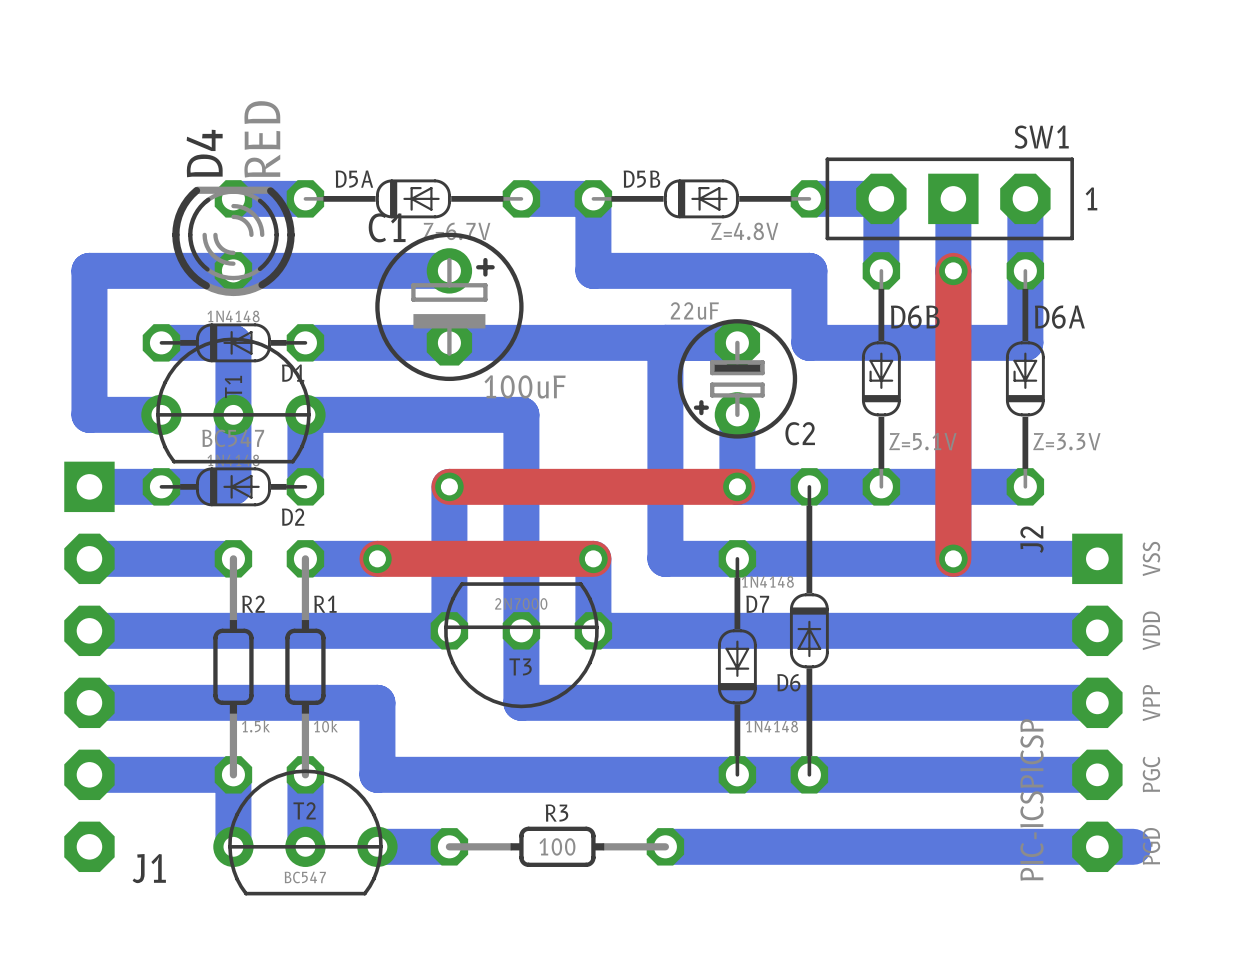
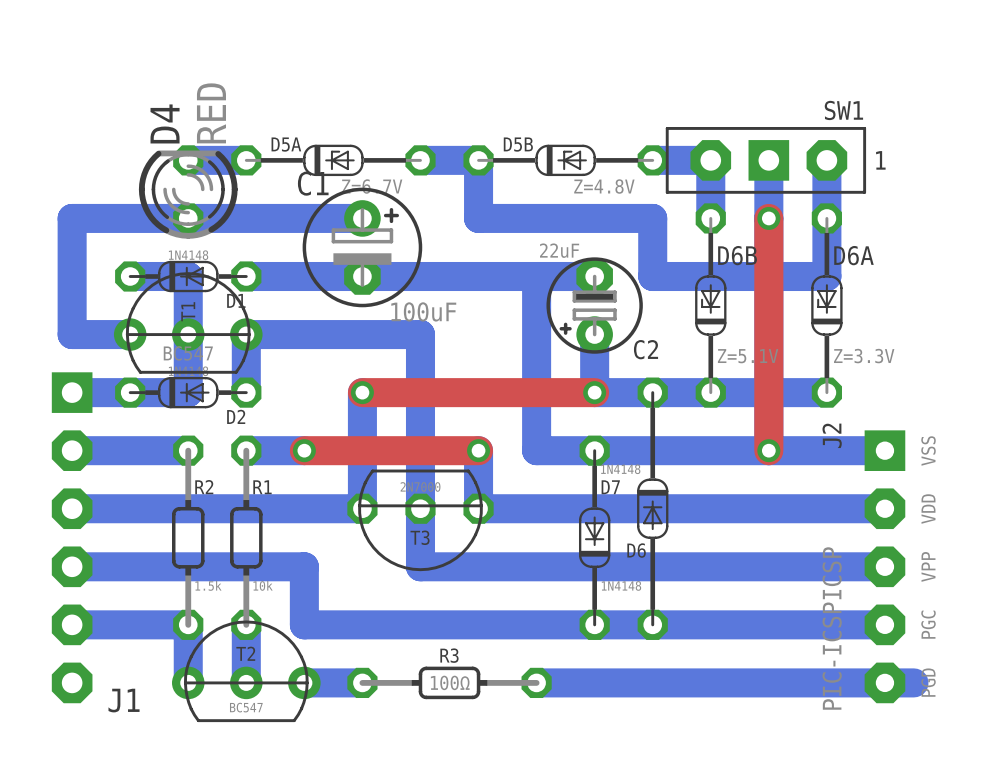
R3 value: 100 (557, 846) -> 100Ω (450, 682)

